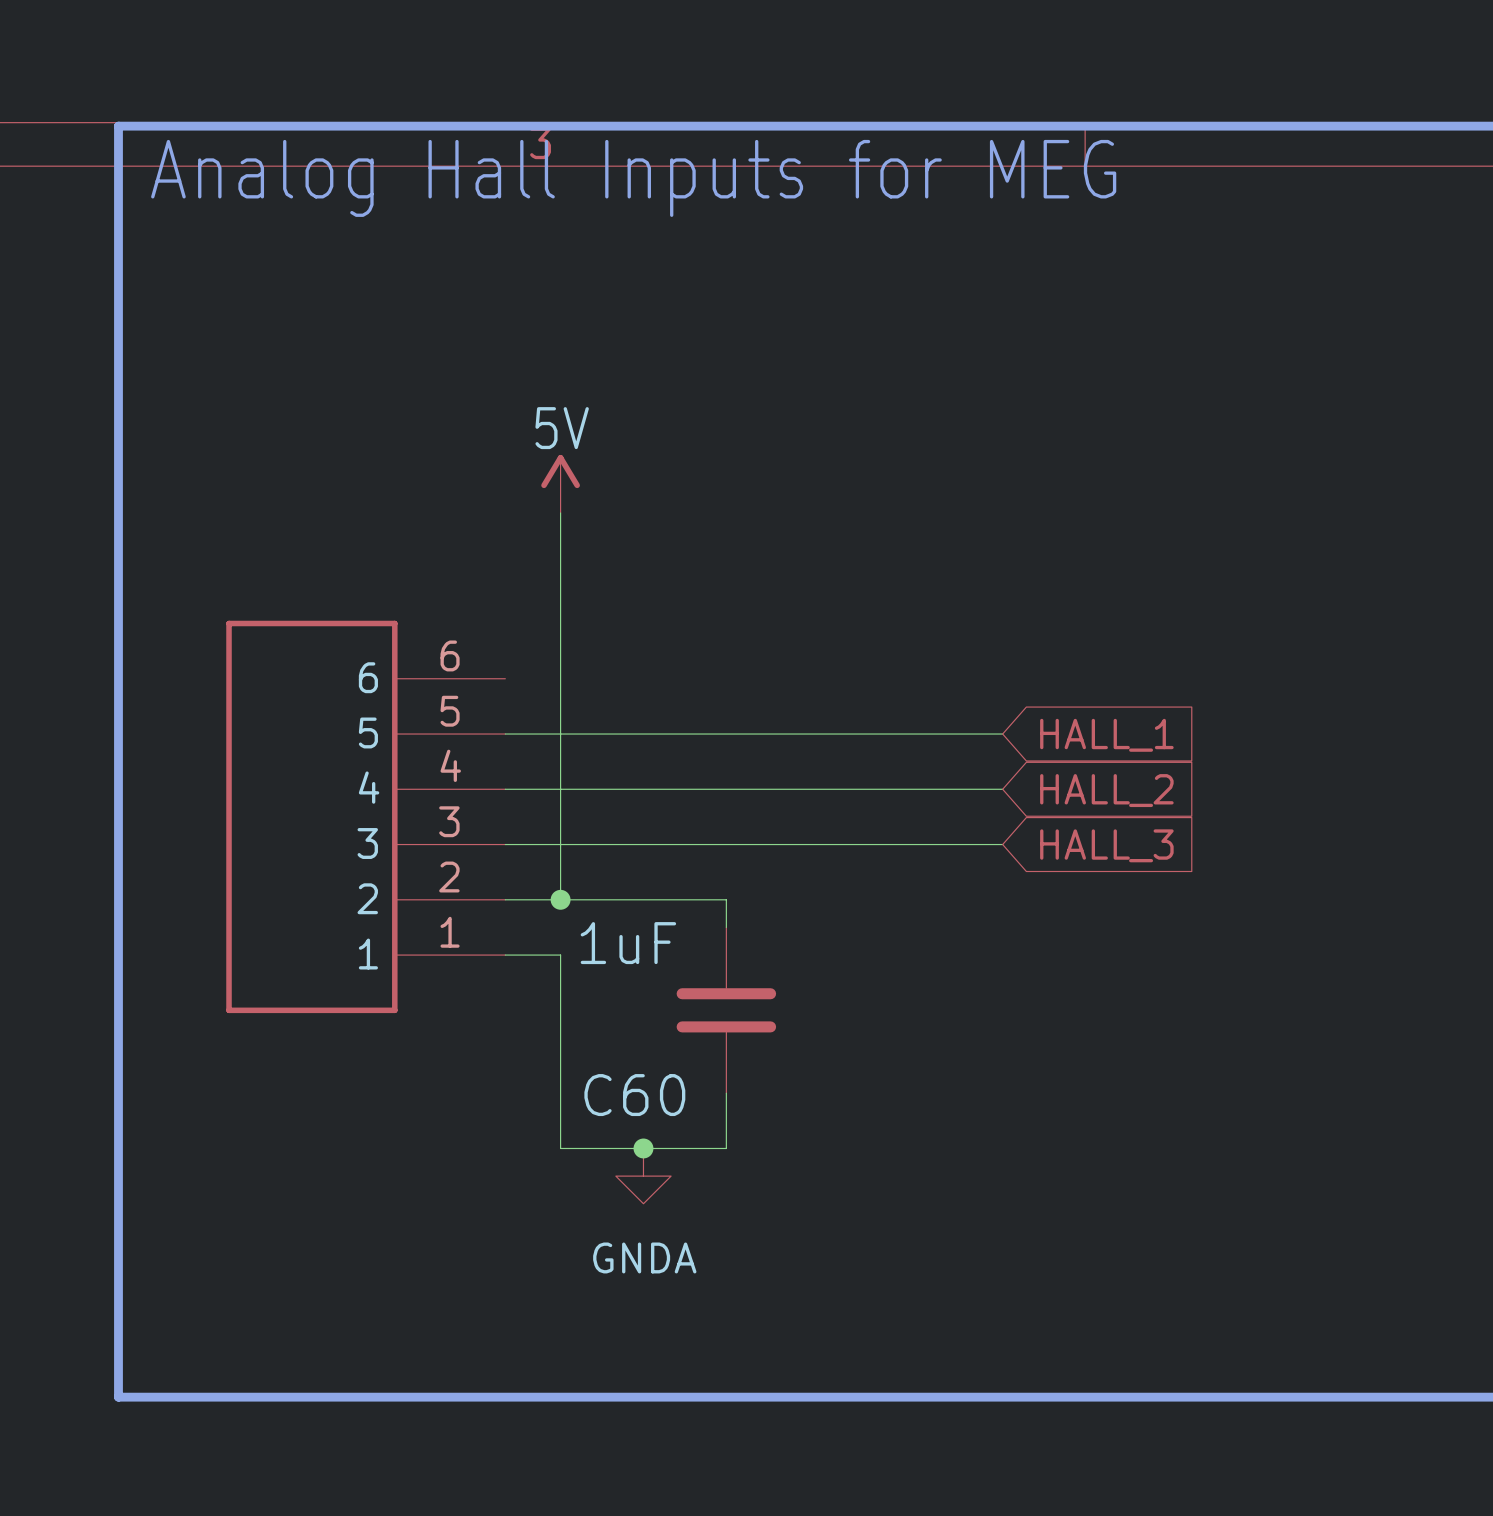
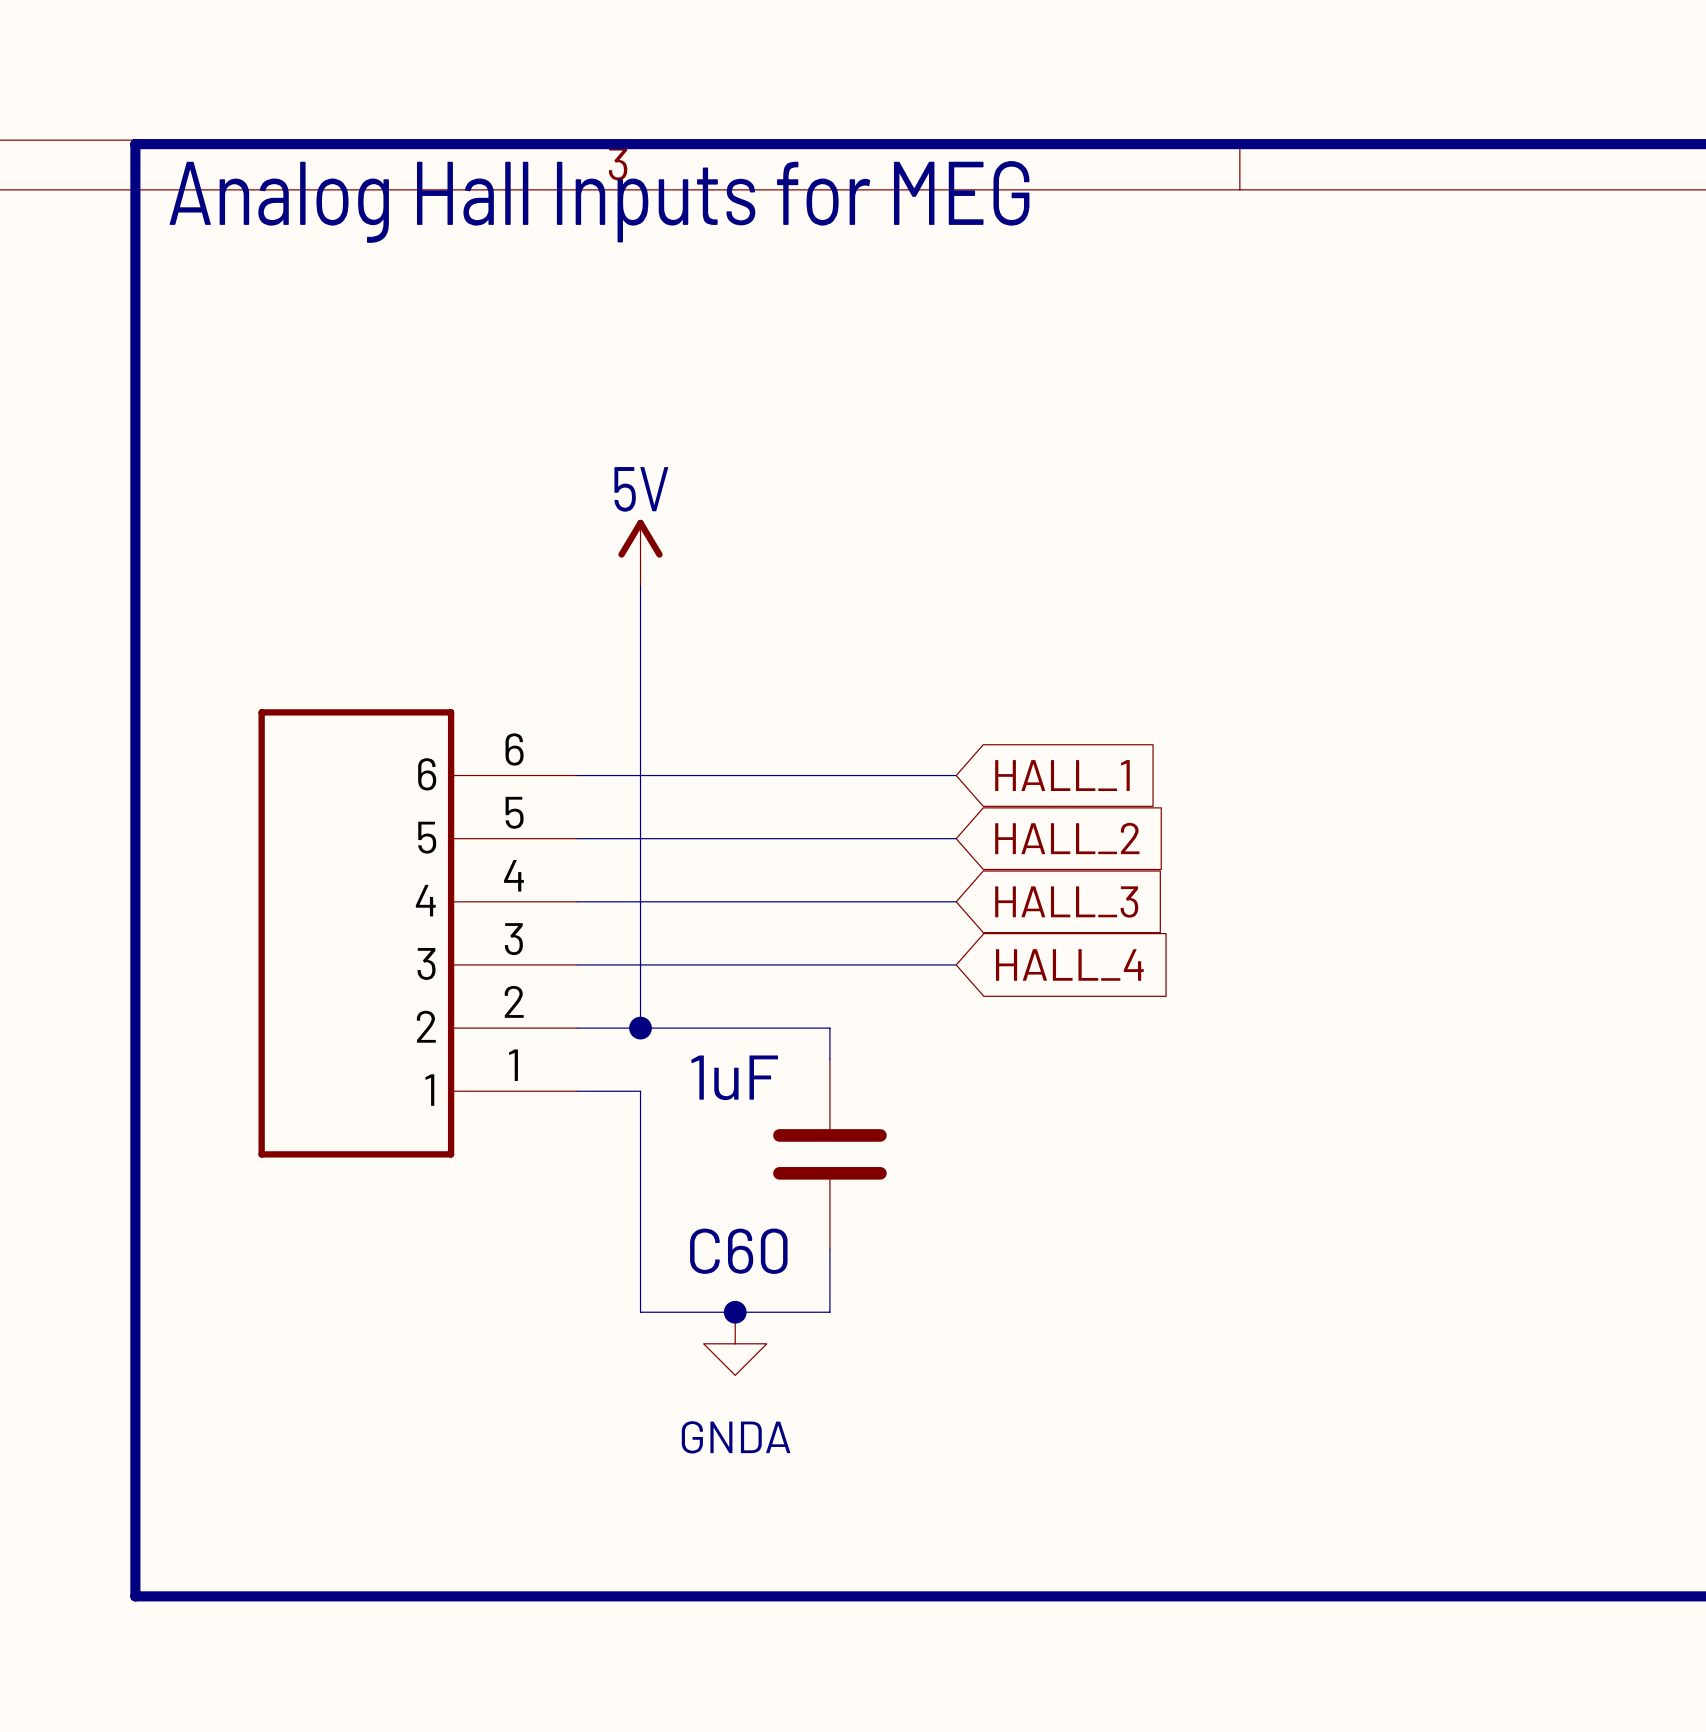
wire: none -> (577, 775) (956, 775)
wire: (836, 734) (1002, 734) -> none
global label position: HALL_1 (1106, 735) -> HALL_1 (1062, 775)
wire: (836, 789) (1002, 789) -> none
global label position: HALL_2 (1106, 790) -> HALL_2 (1067, 838)
wire: (836, 844) (1002, 844) -> none
global label: none -> HALL_4 (1069, 964)
global label position: HALL_3 (1106, 845) -> HALL_3 (1066, 901)

